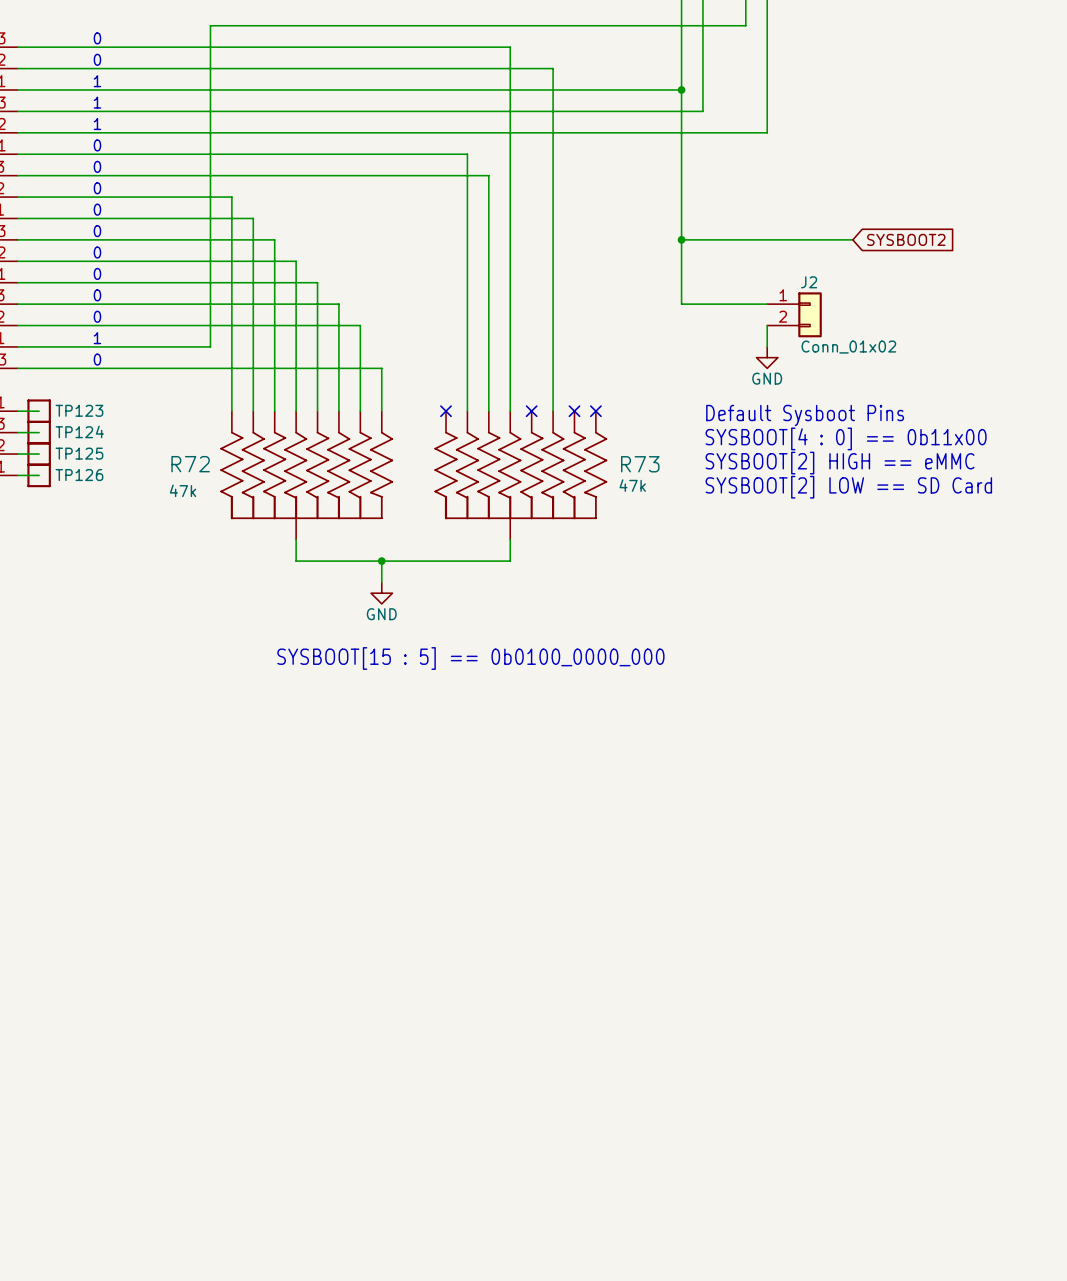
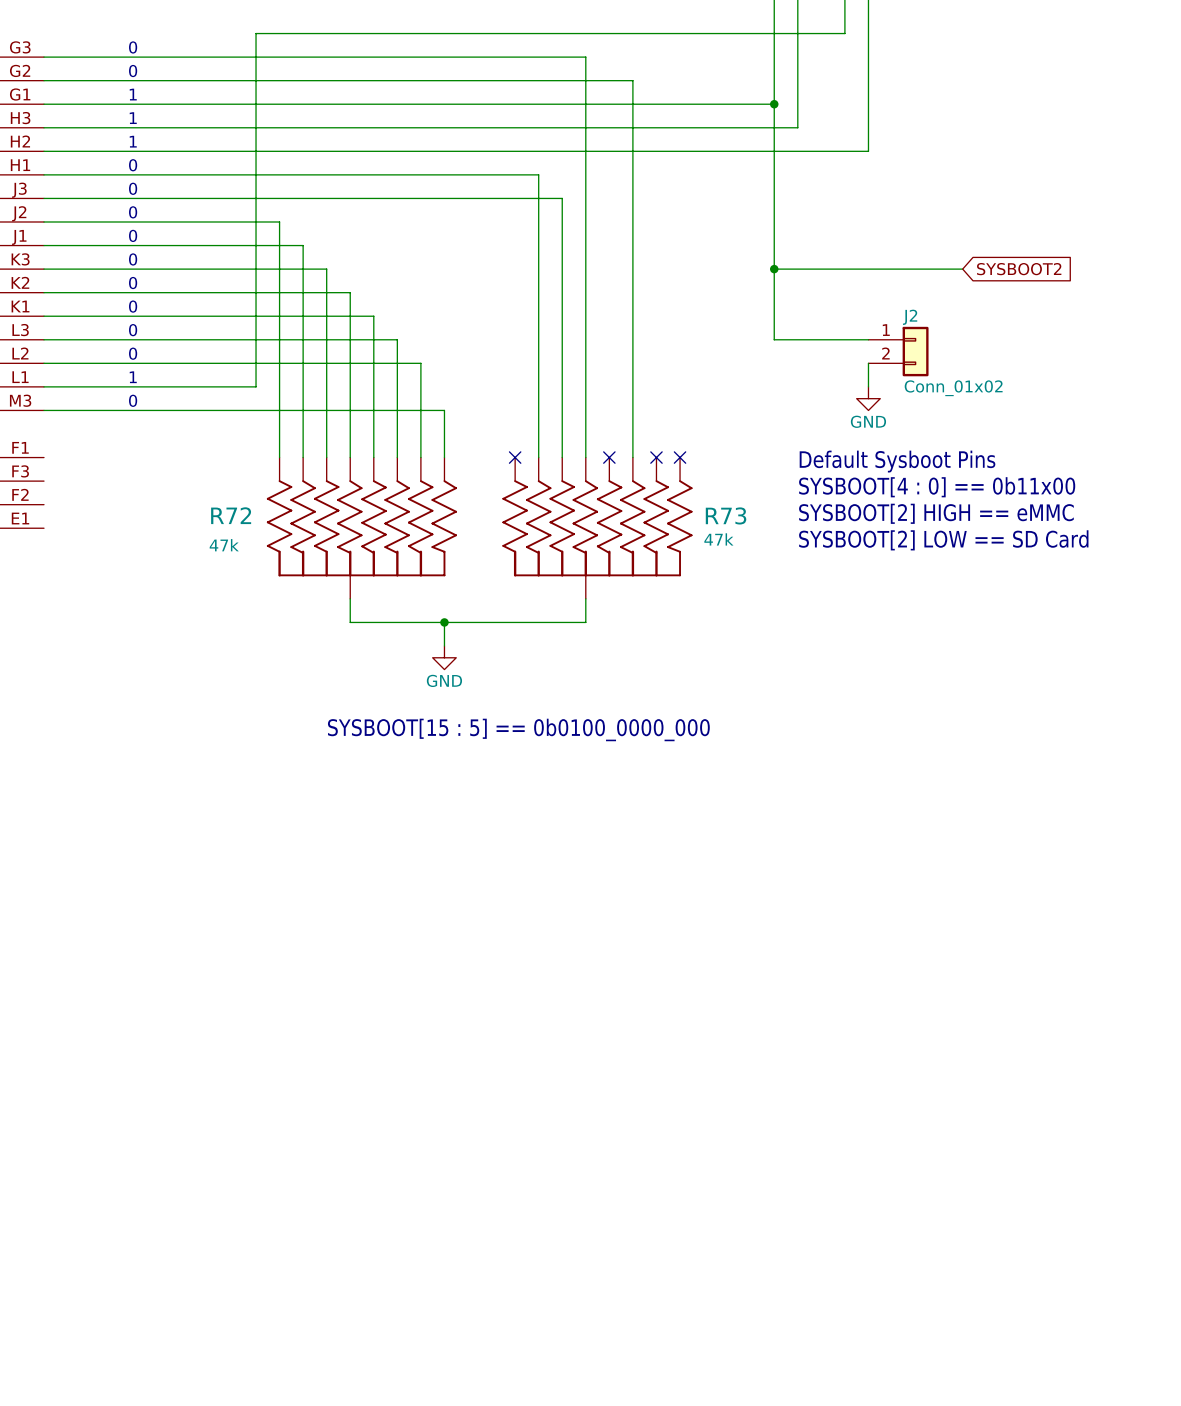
wire: (17, 411) (39, 411) -> none
TP123: (39, 411) -> none
wire: (17, 432) (39, 432) -> none
TP124: (39, 432) -> none
wire: (17, 454) (39, 454) -> none
TP125: (39, 454) -> none
wire: (17, 475) (39, 475) -> none
TP126: (39, 475) -> none

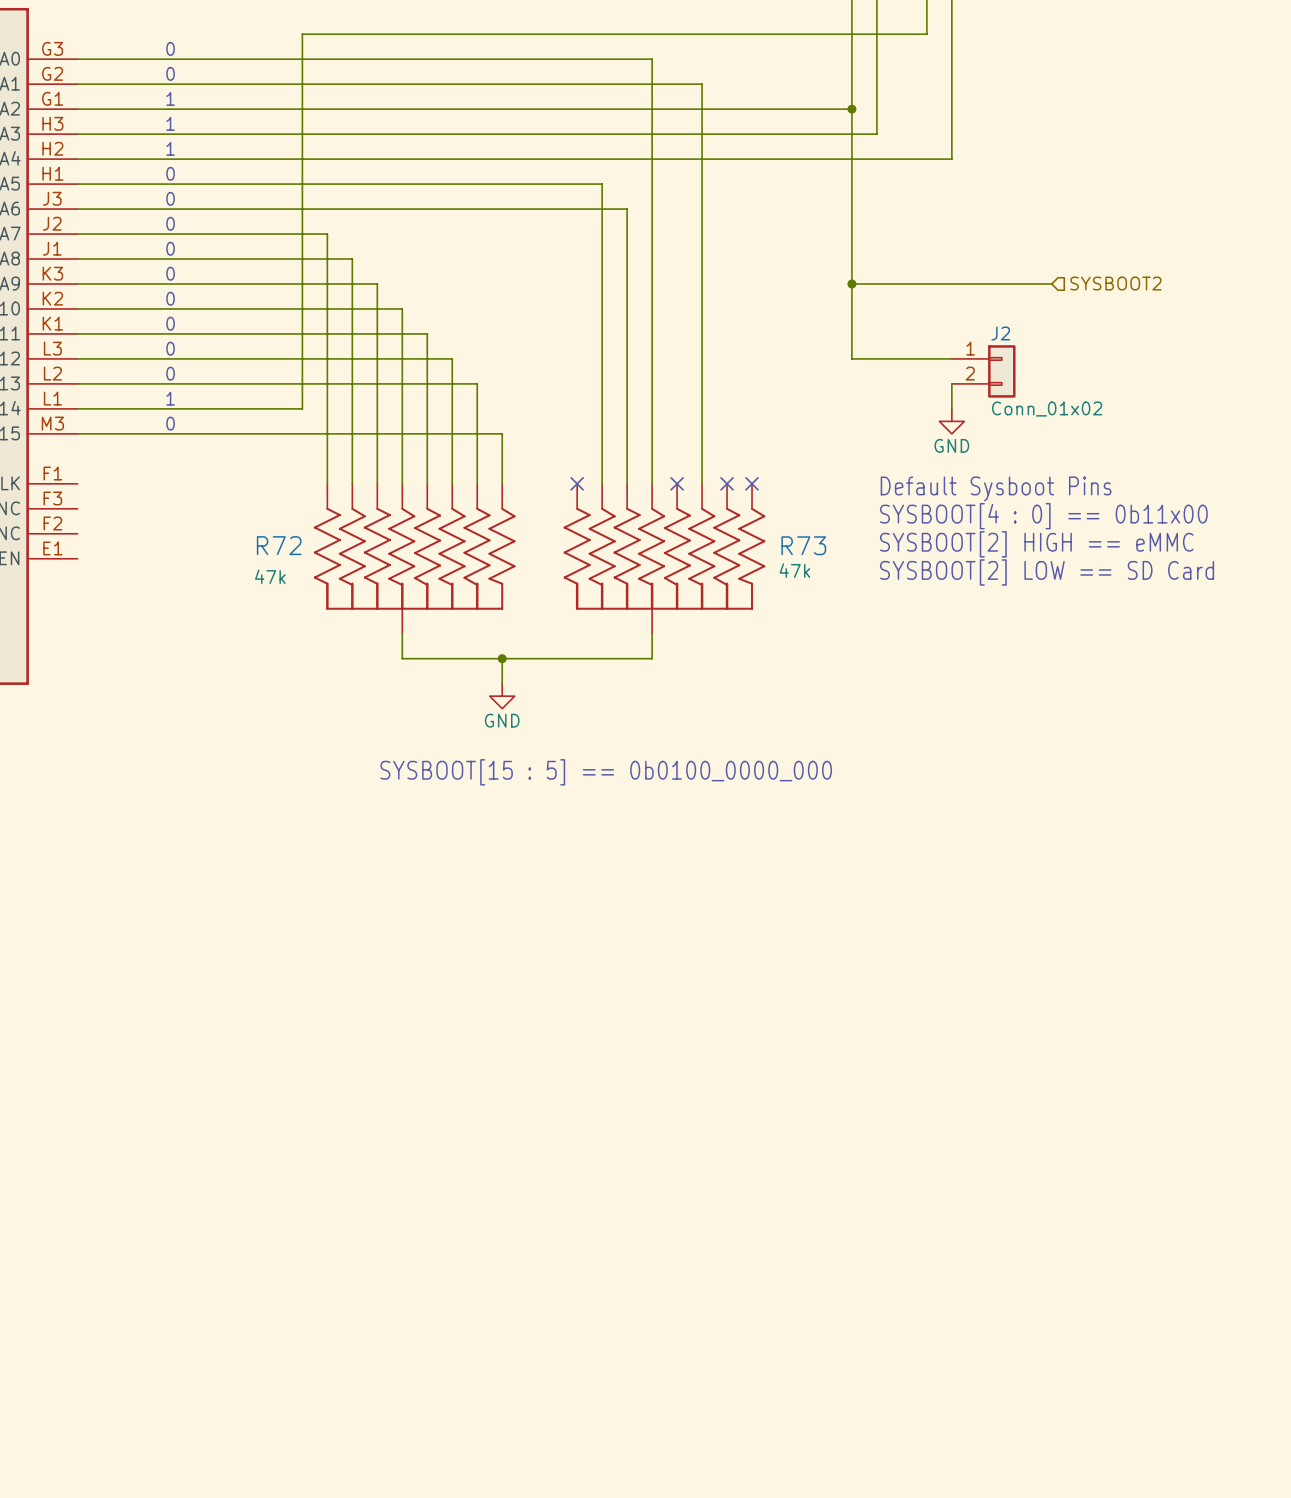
hierarchical label: none -> SYSBOOT2 (1115, 283)
global label: SYSBOOT2 (1019, 269) -> none

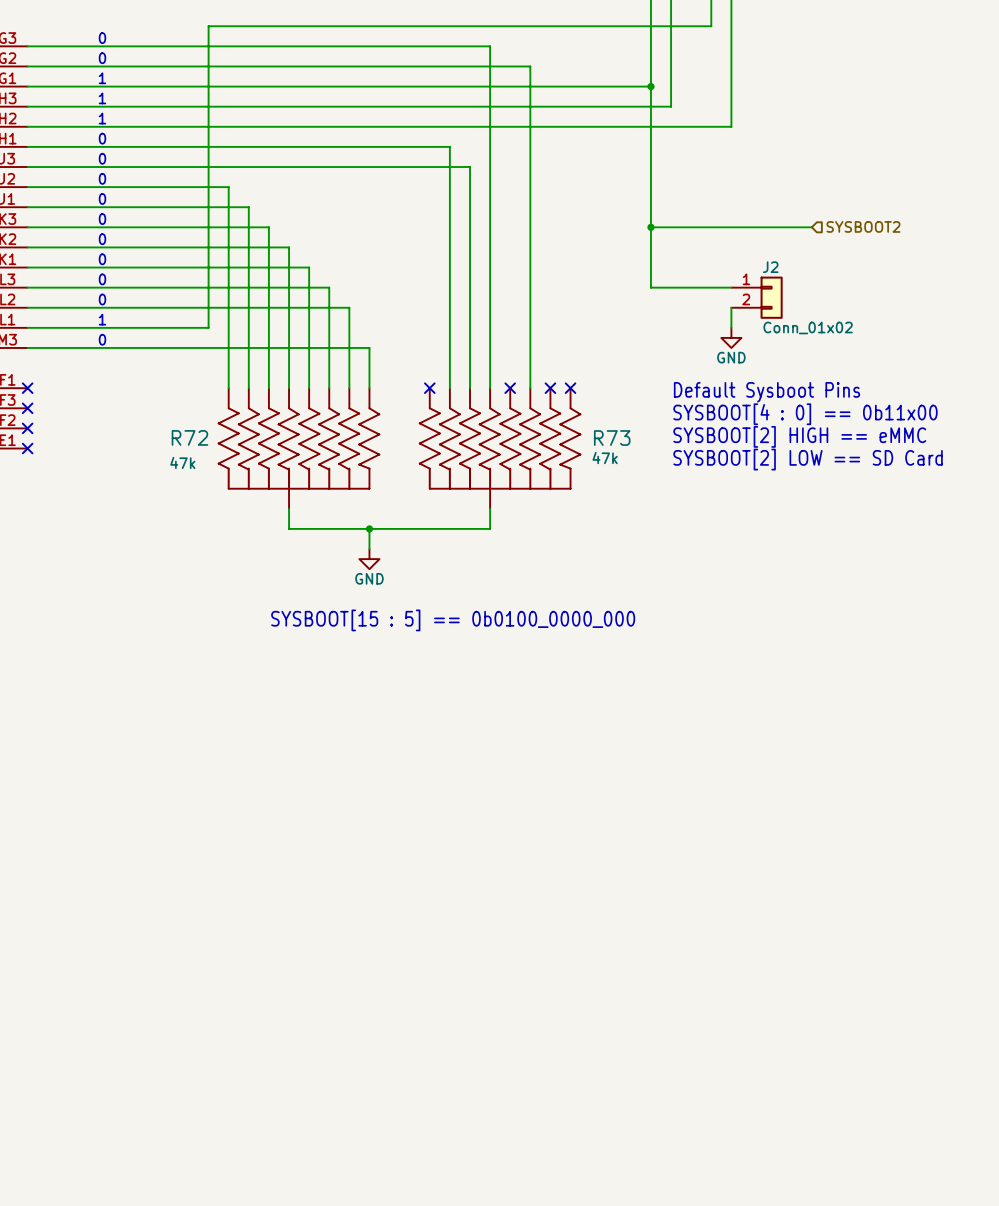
no-connect mark: none -> (27, 388)
no-connect mark: none -> (27, 408)
no-connect mark: none -> (27, 428)
no-connect mark: none -> (27, 448)

